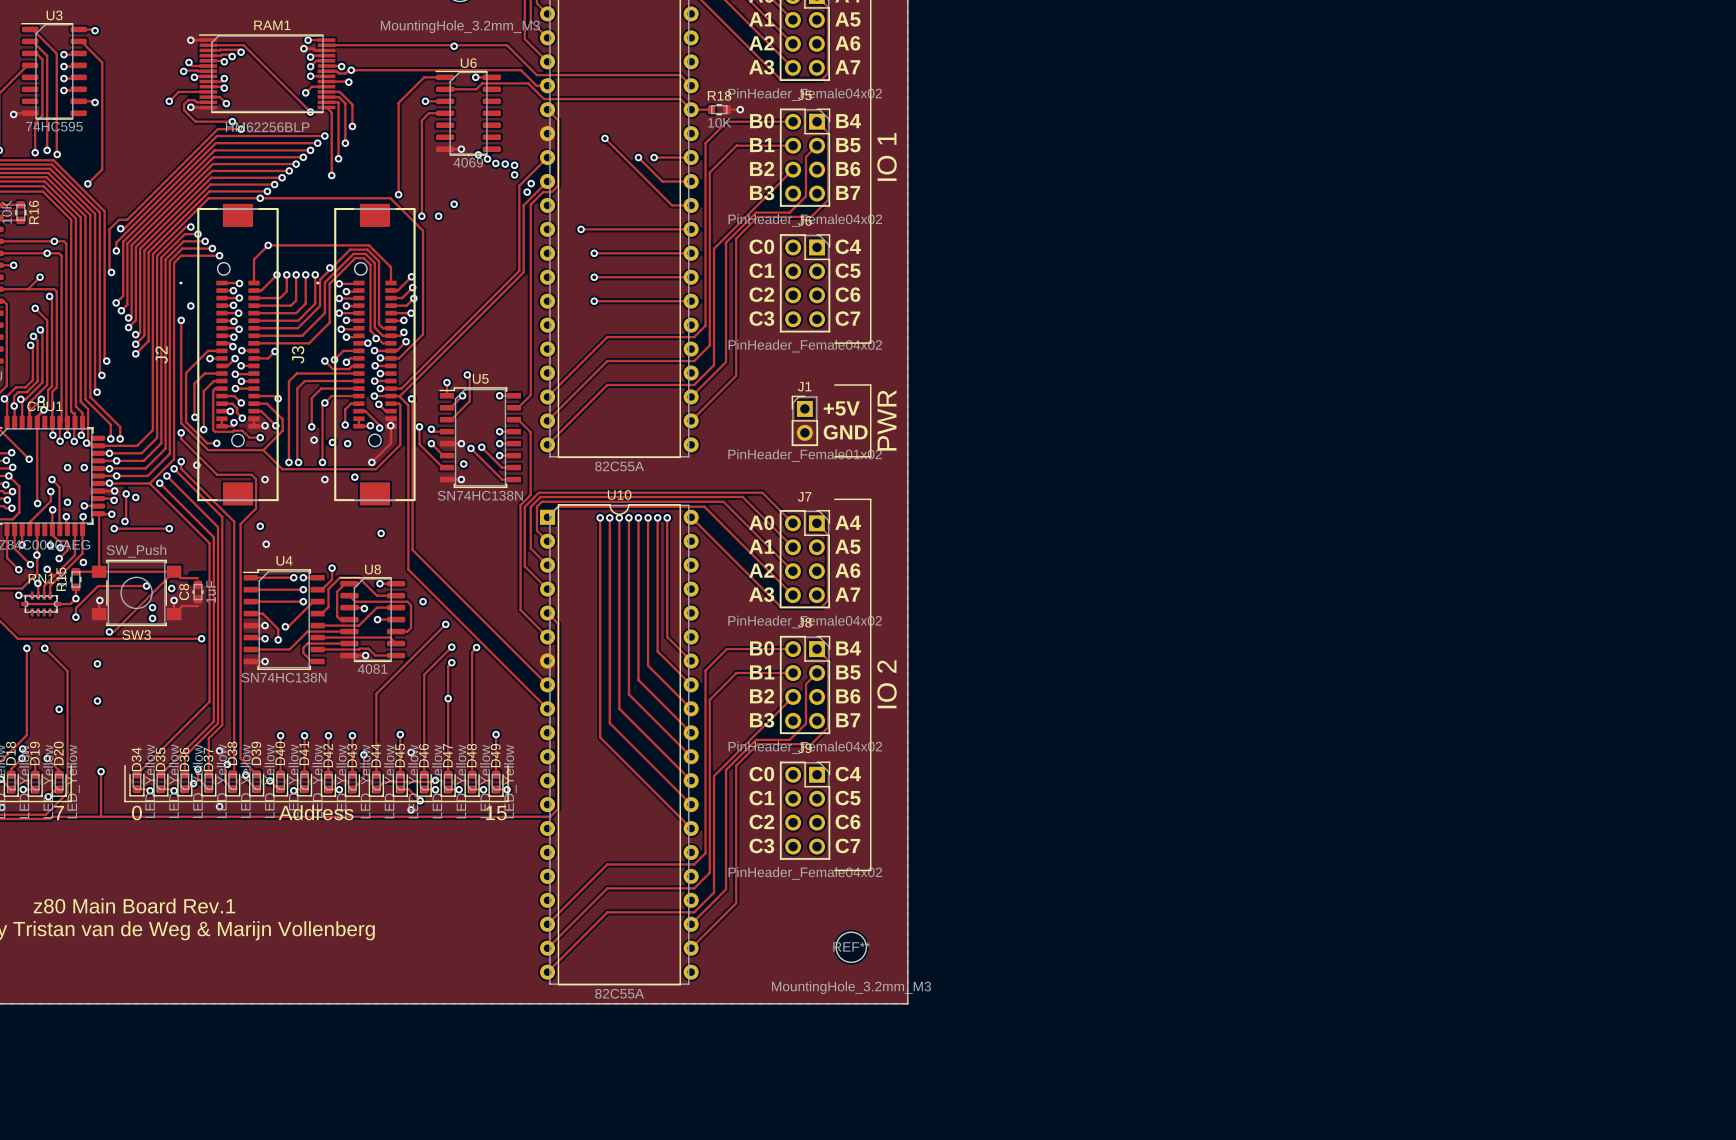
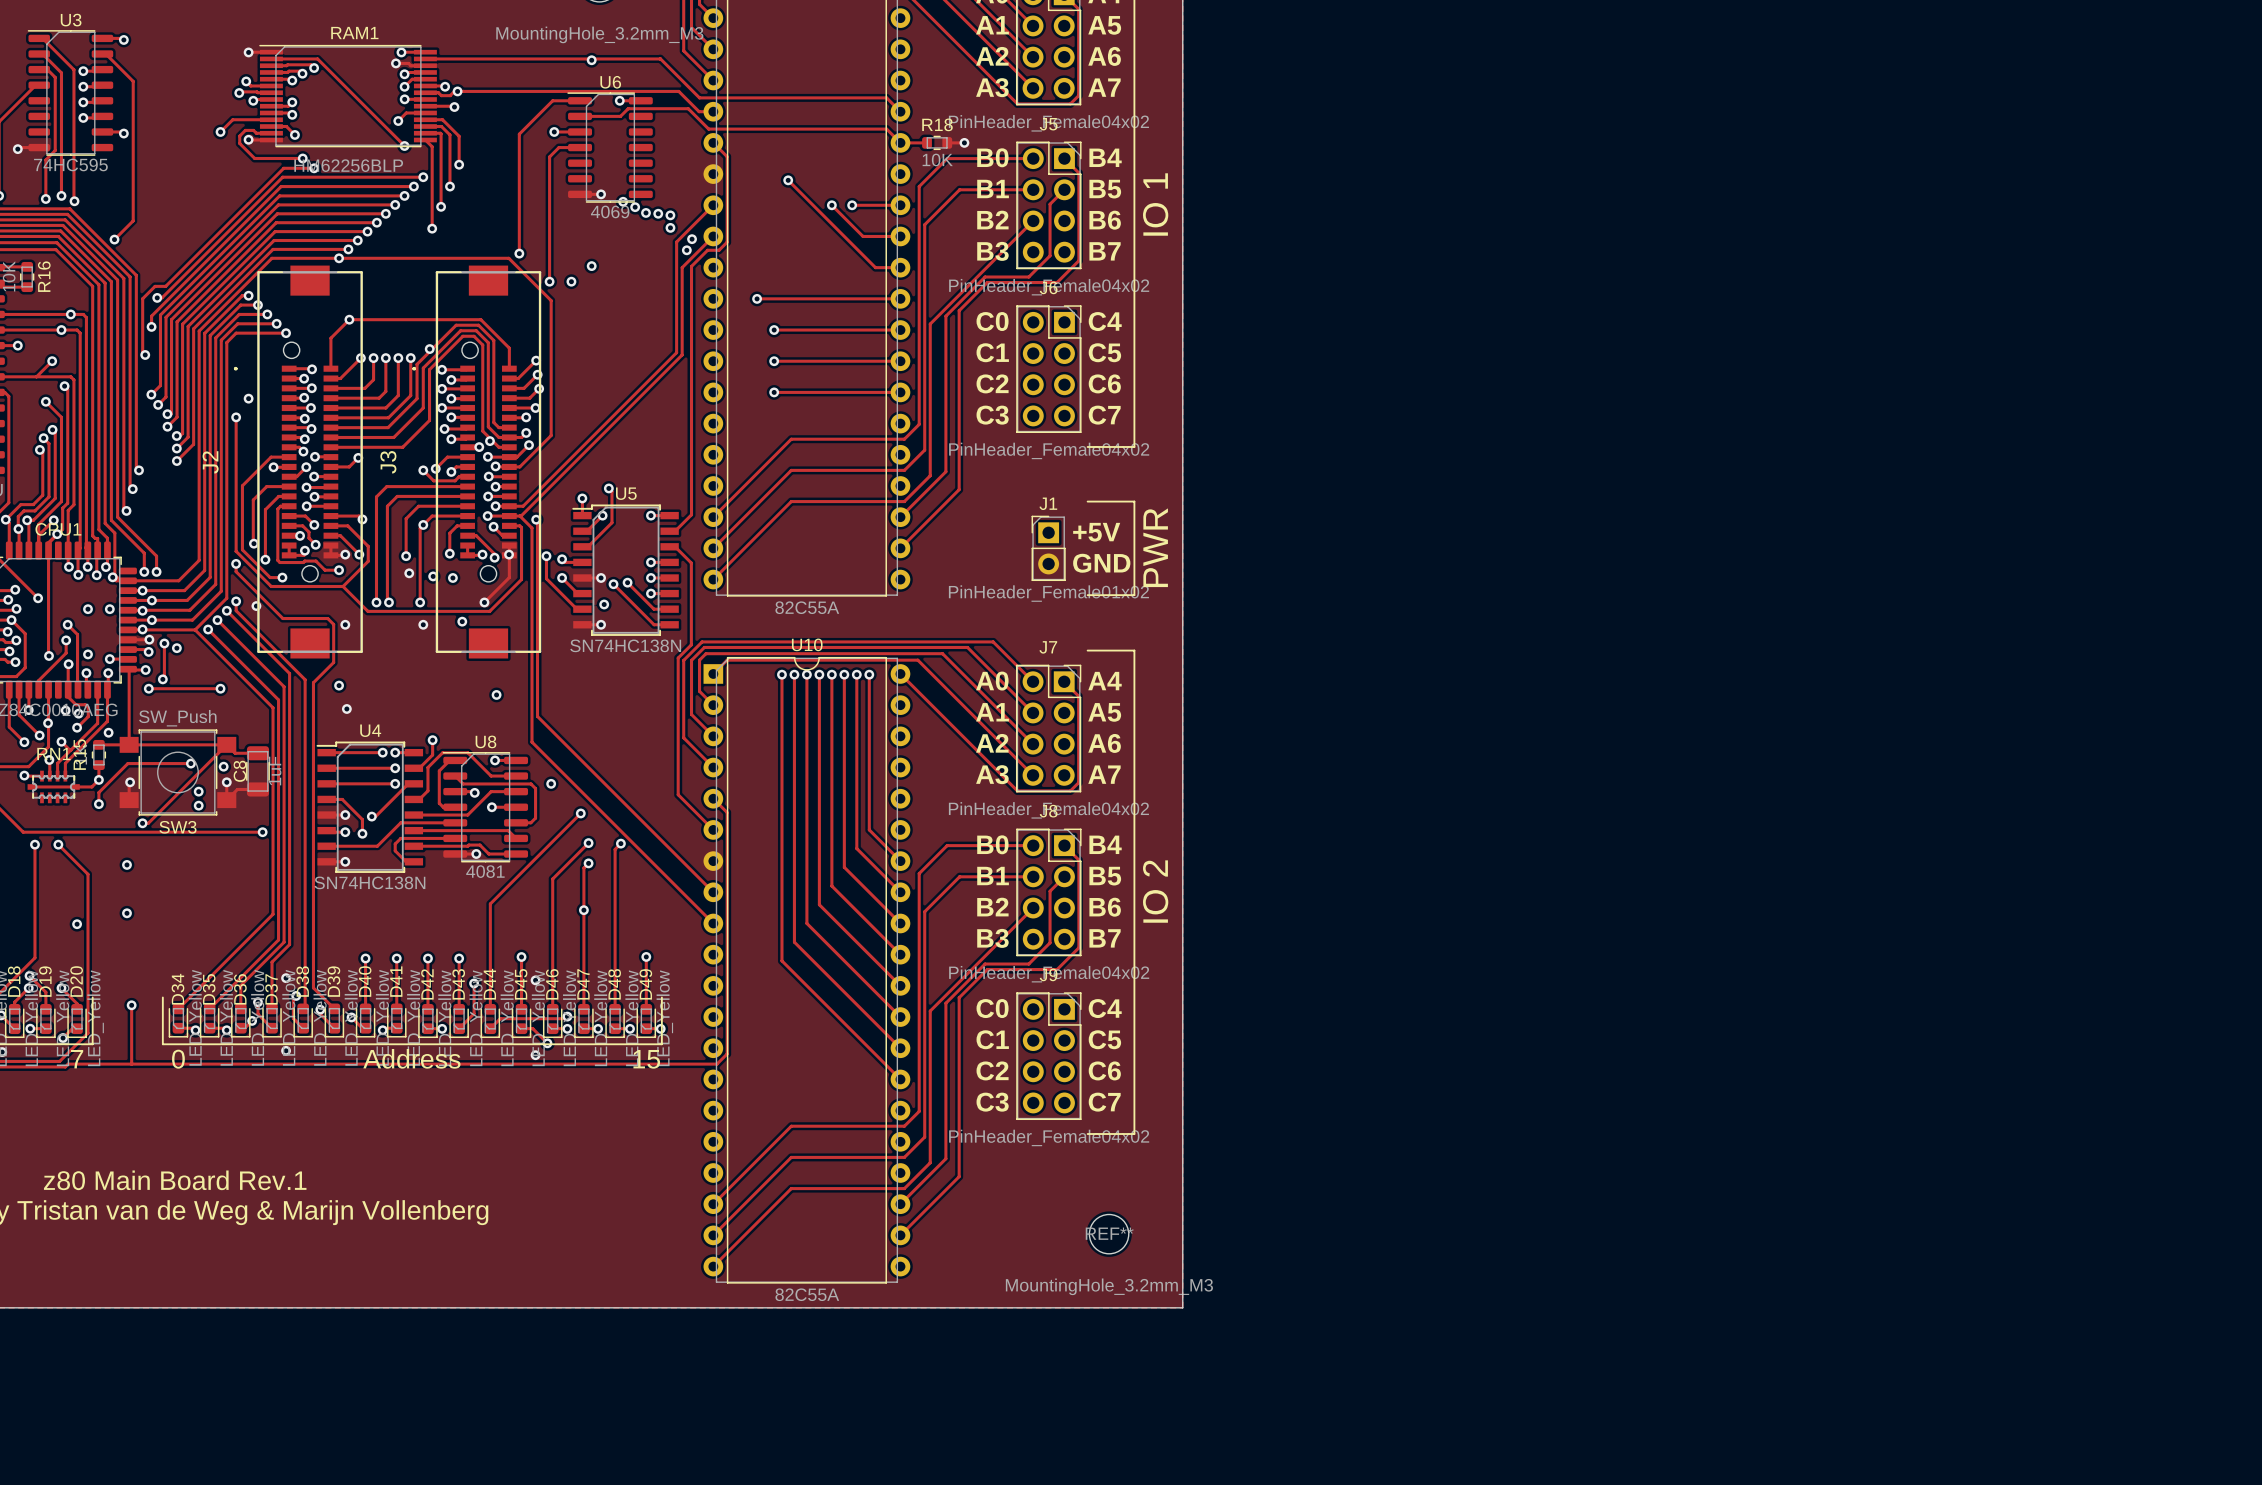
C8 footprint: [192, 580, 204, 604] -> [246, 746, 270, 797]

